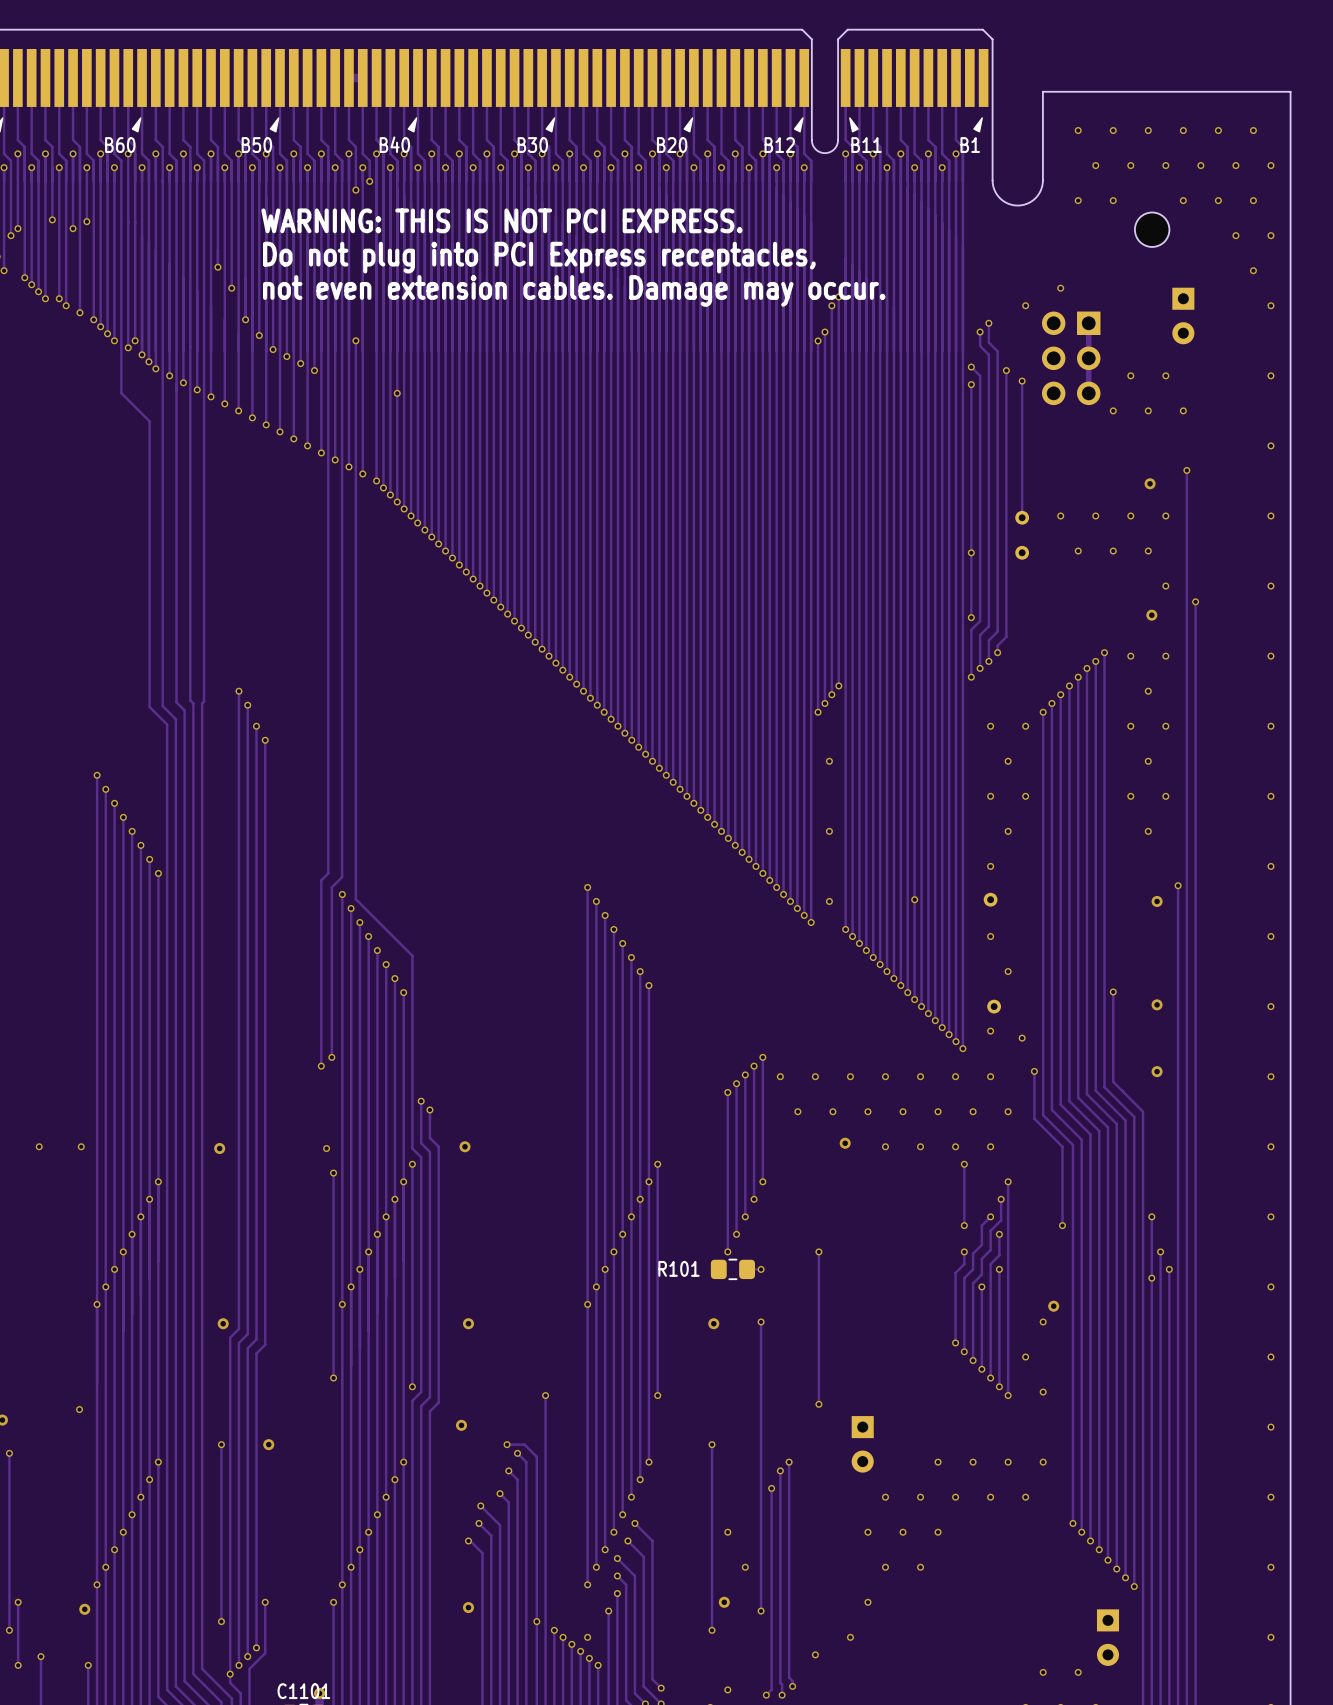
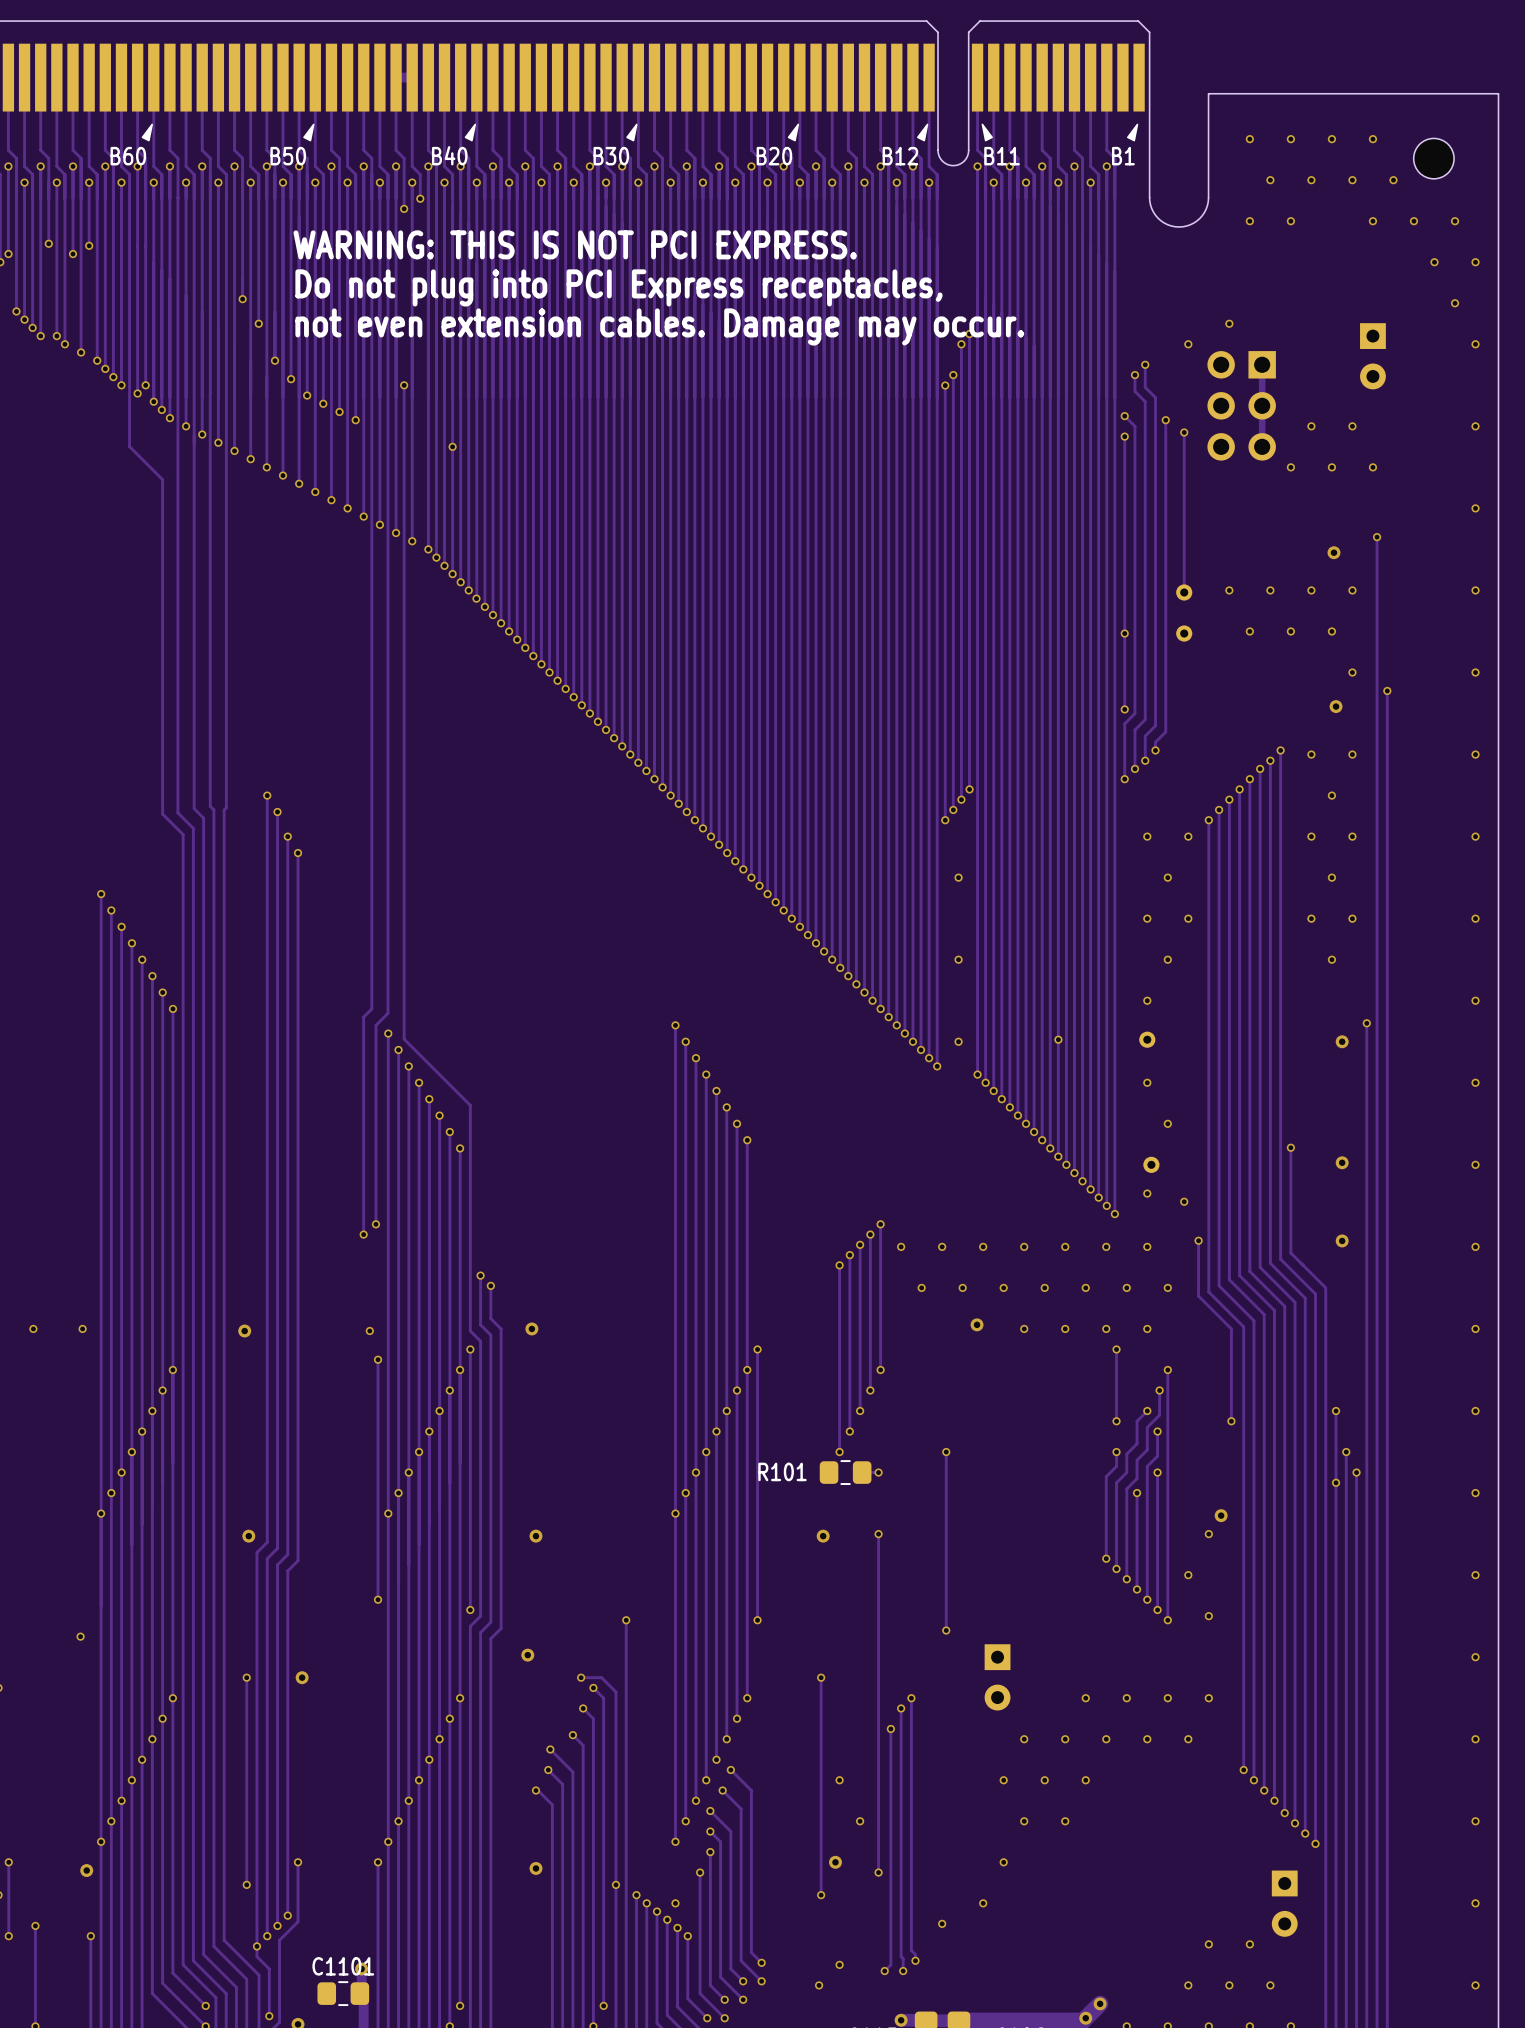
via: (1218, 130) -> none
via: (1253, 130) -> none
via: (1235, 165) -> none
via: (1270, 165) -> none
part position: (1152, 229) -> (1433, 158)

